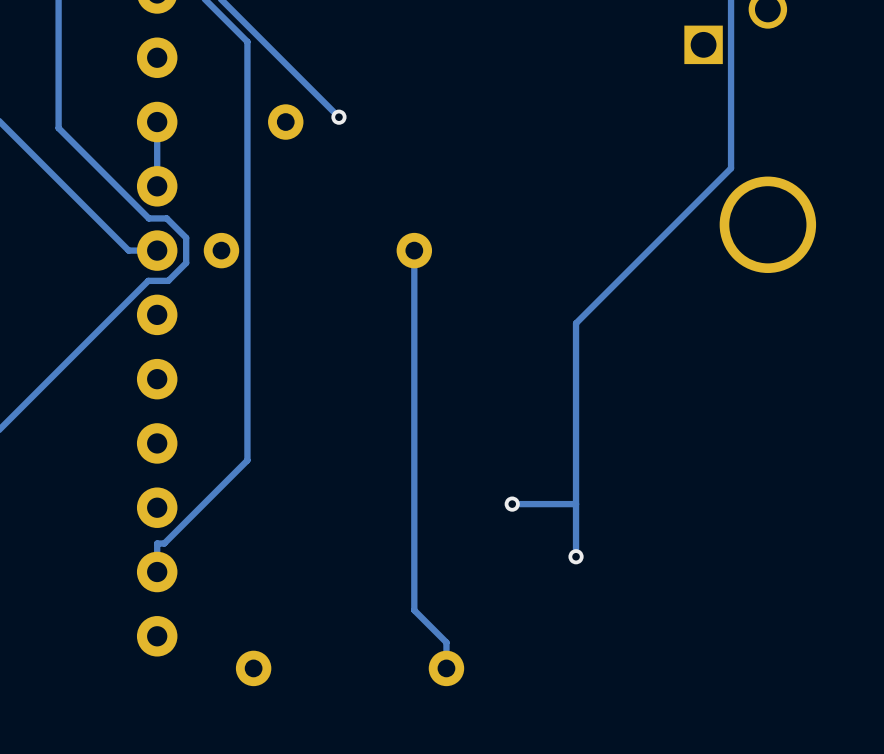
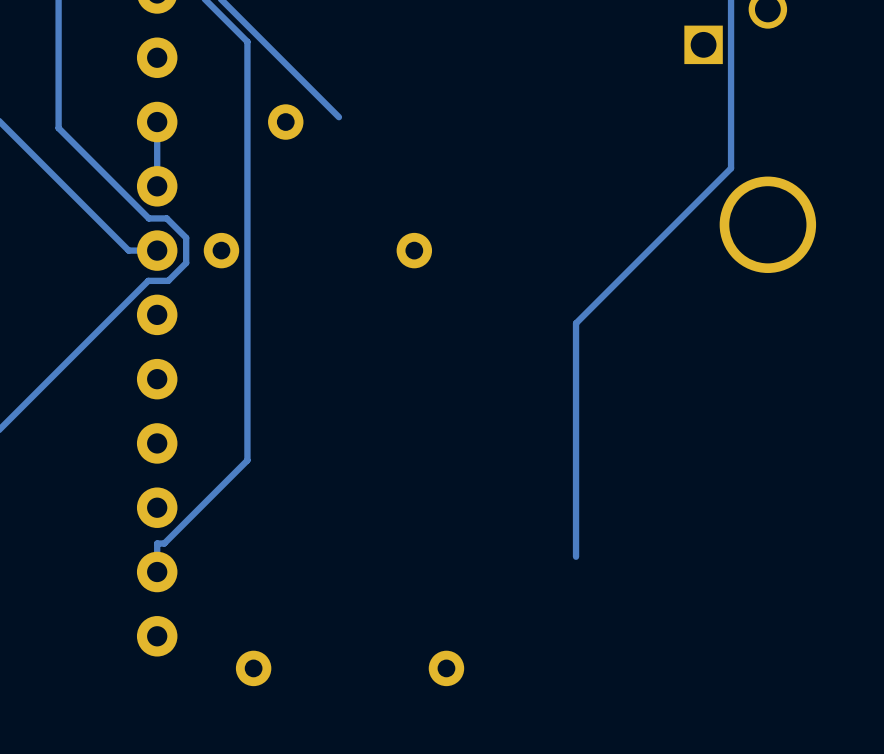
via: (338, 117) -> none
track: (414, 250) (414, 610) (446, 642) (446, 668) -> none
via: (512, 504) -> none
track: (576, 504) (512, 504) -> none
via: (576, 556) -> none

